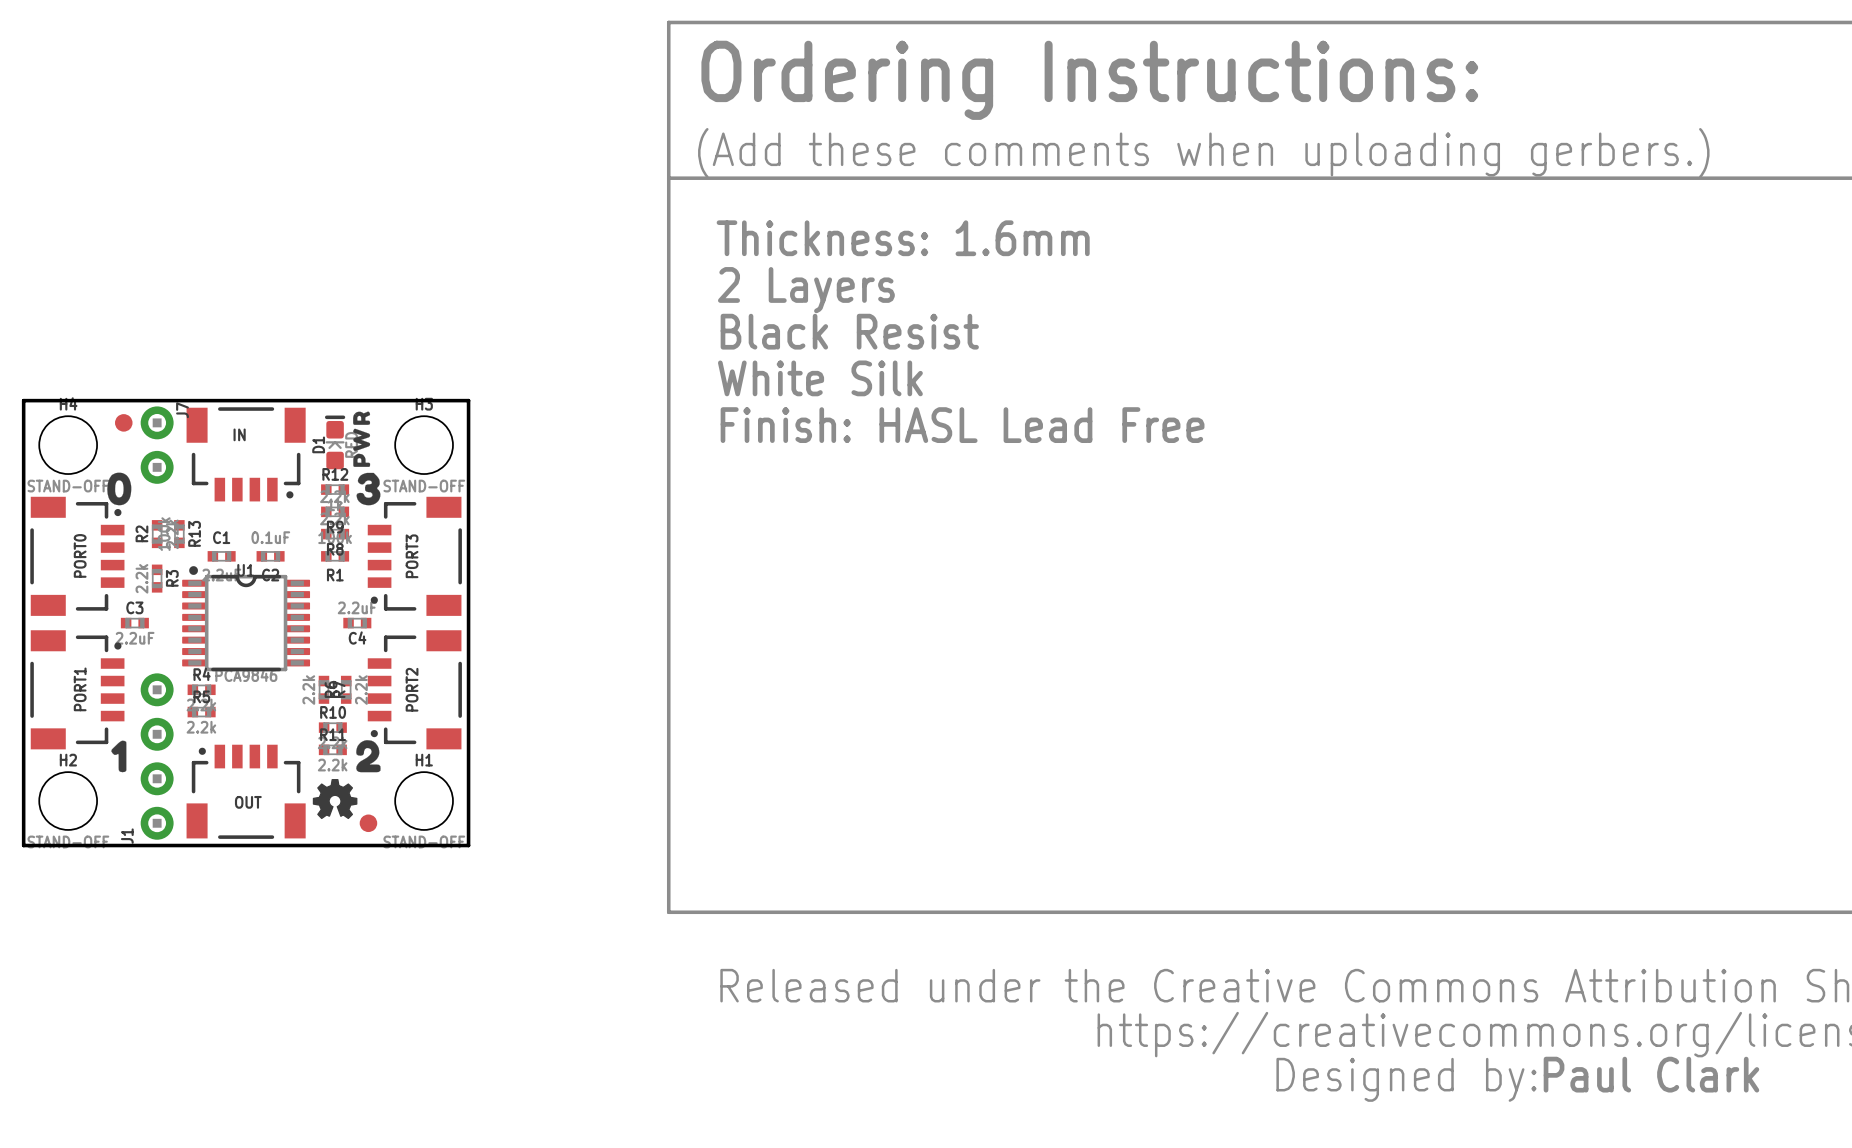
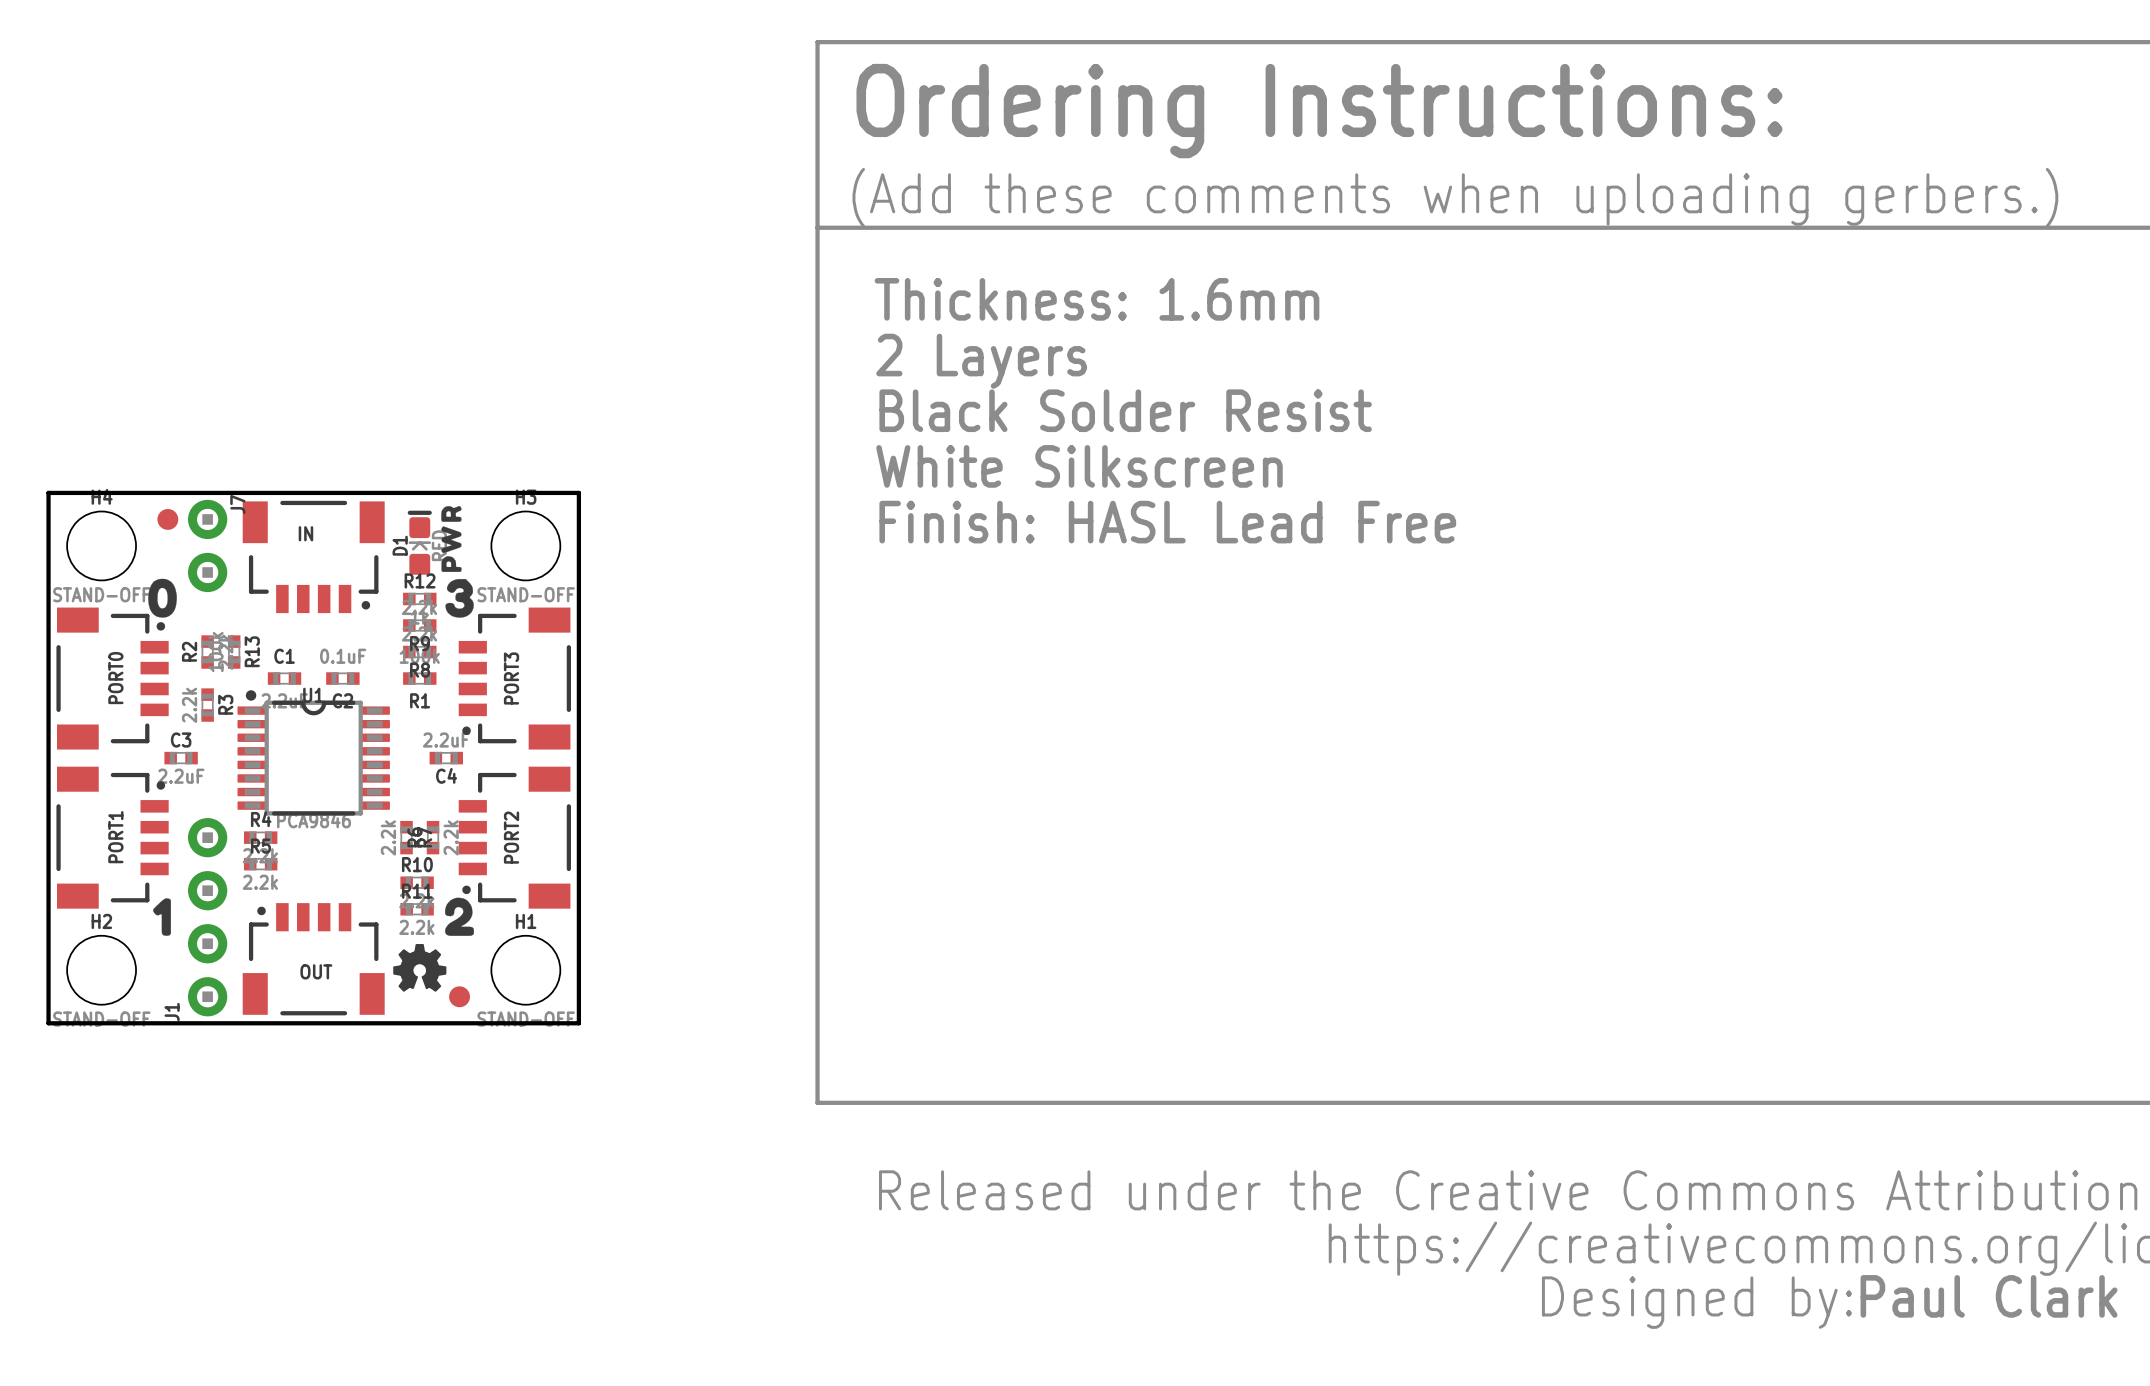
text: Black Resist (849, 331) -> Black Solder Resist (1125, 410)
text: White Silk (820, 378) -> White Silkscreen (1079, 466)

